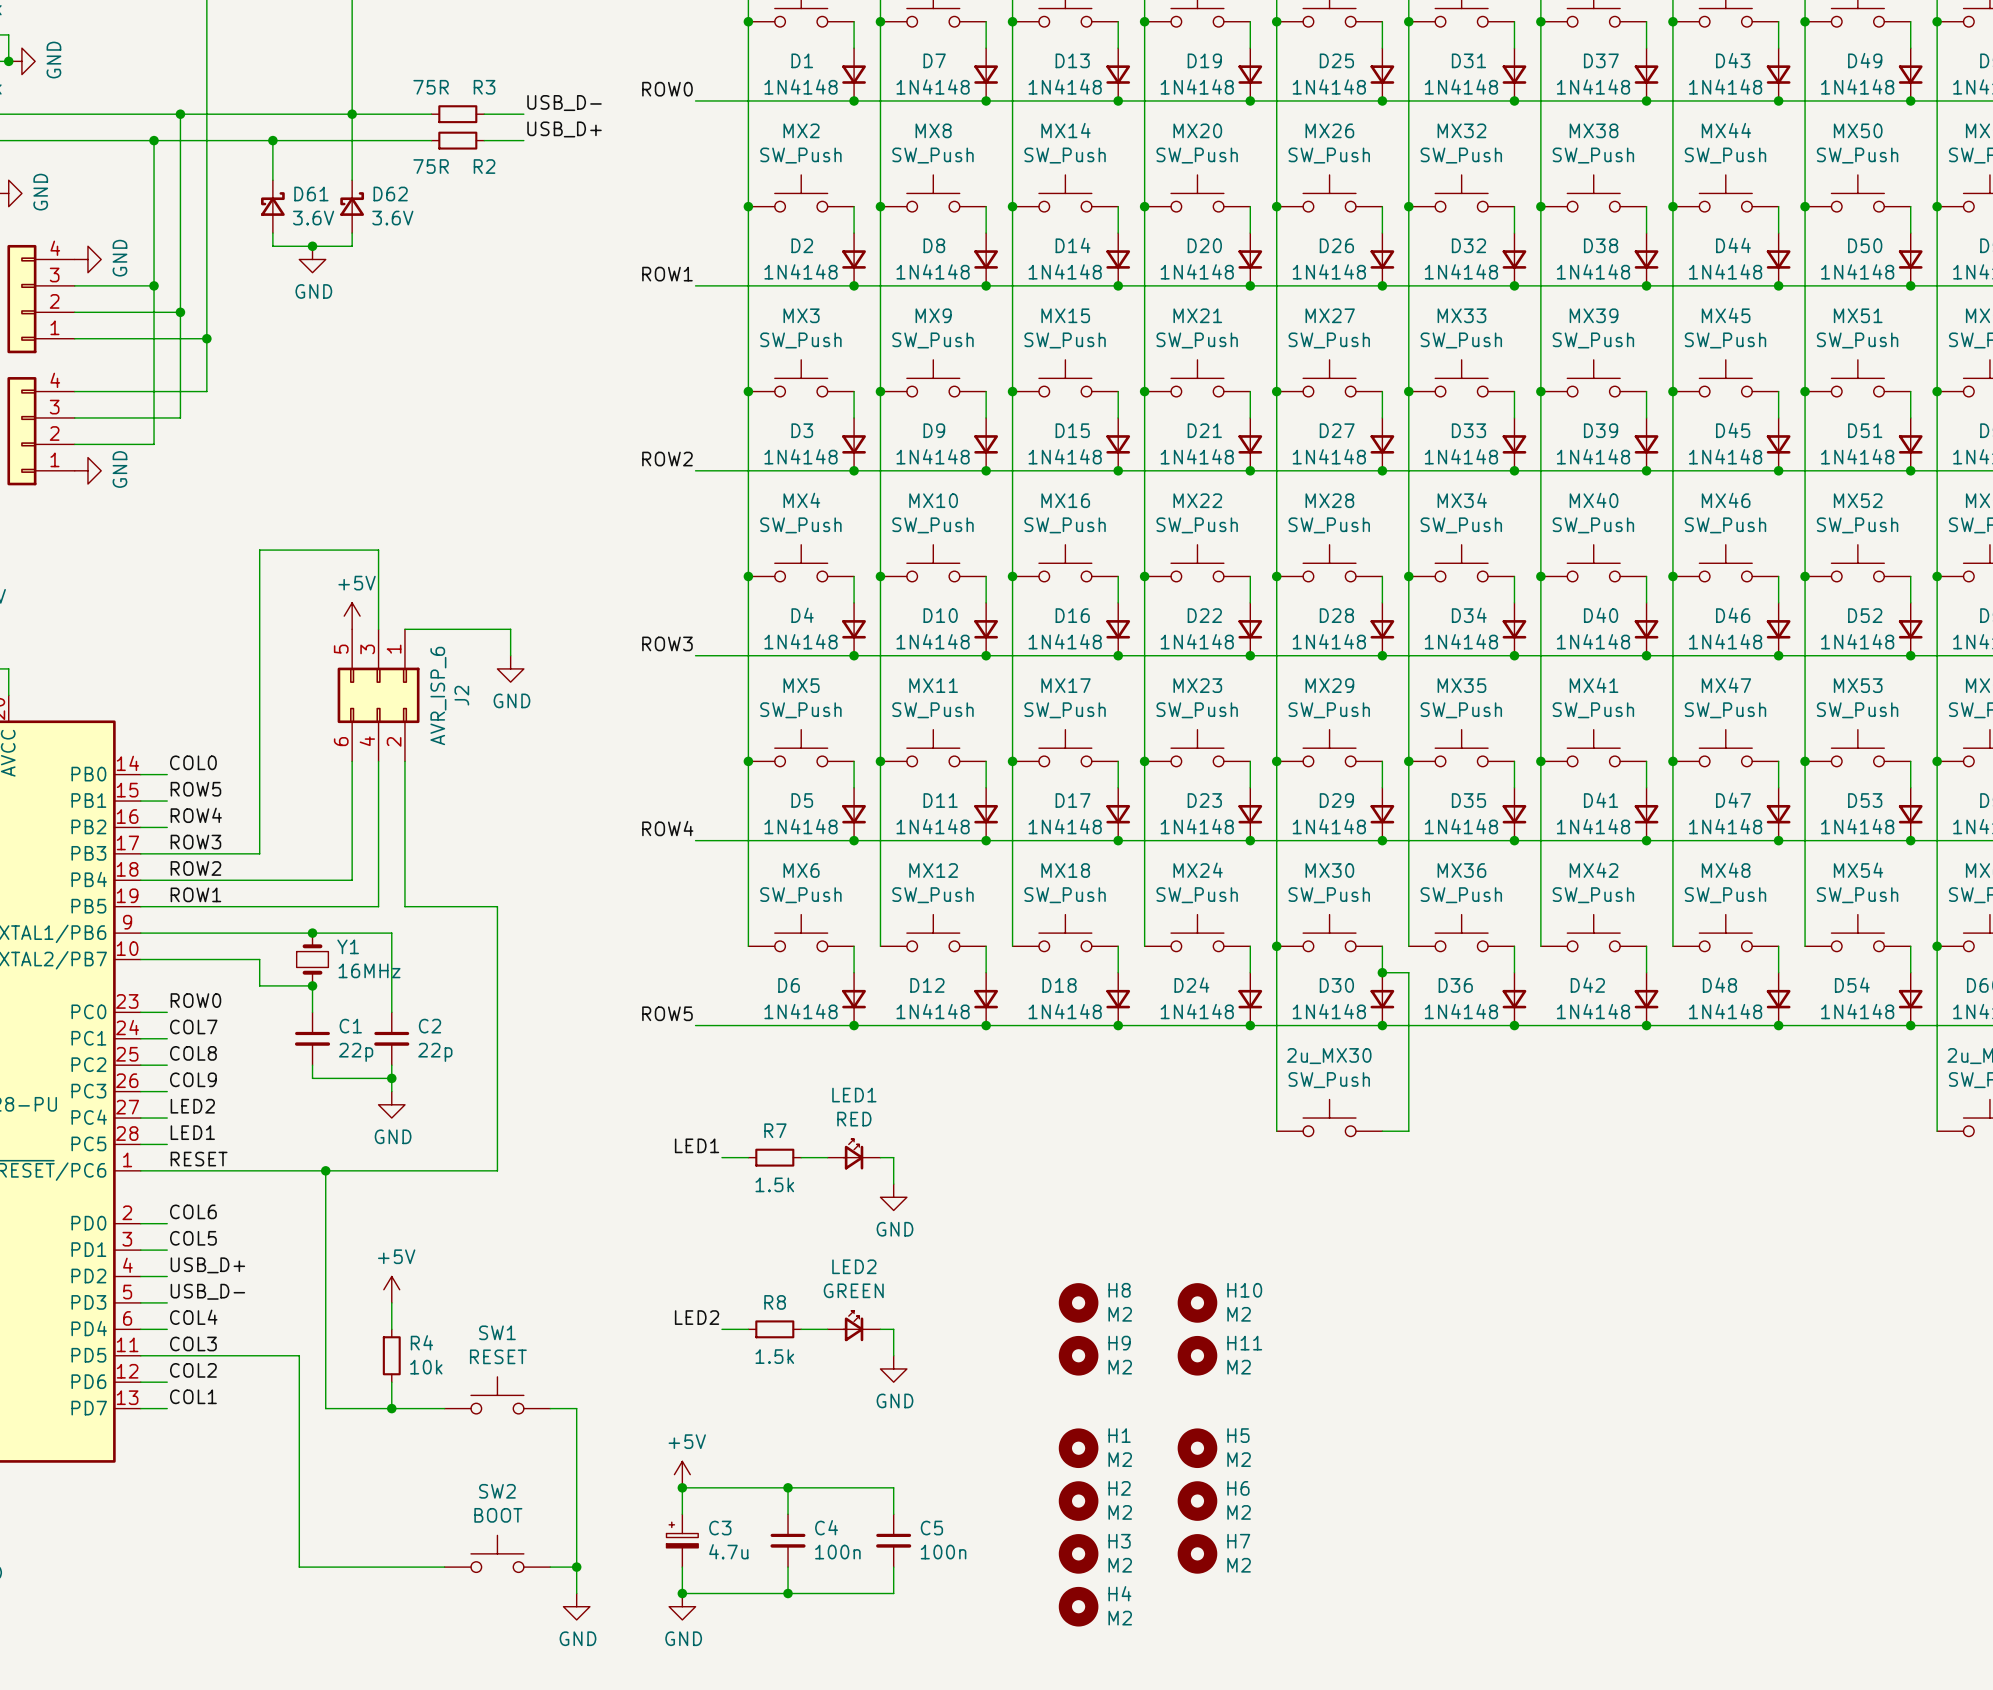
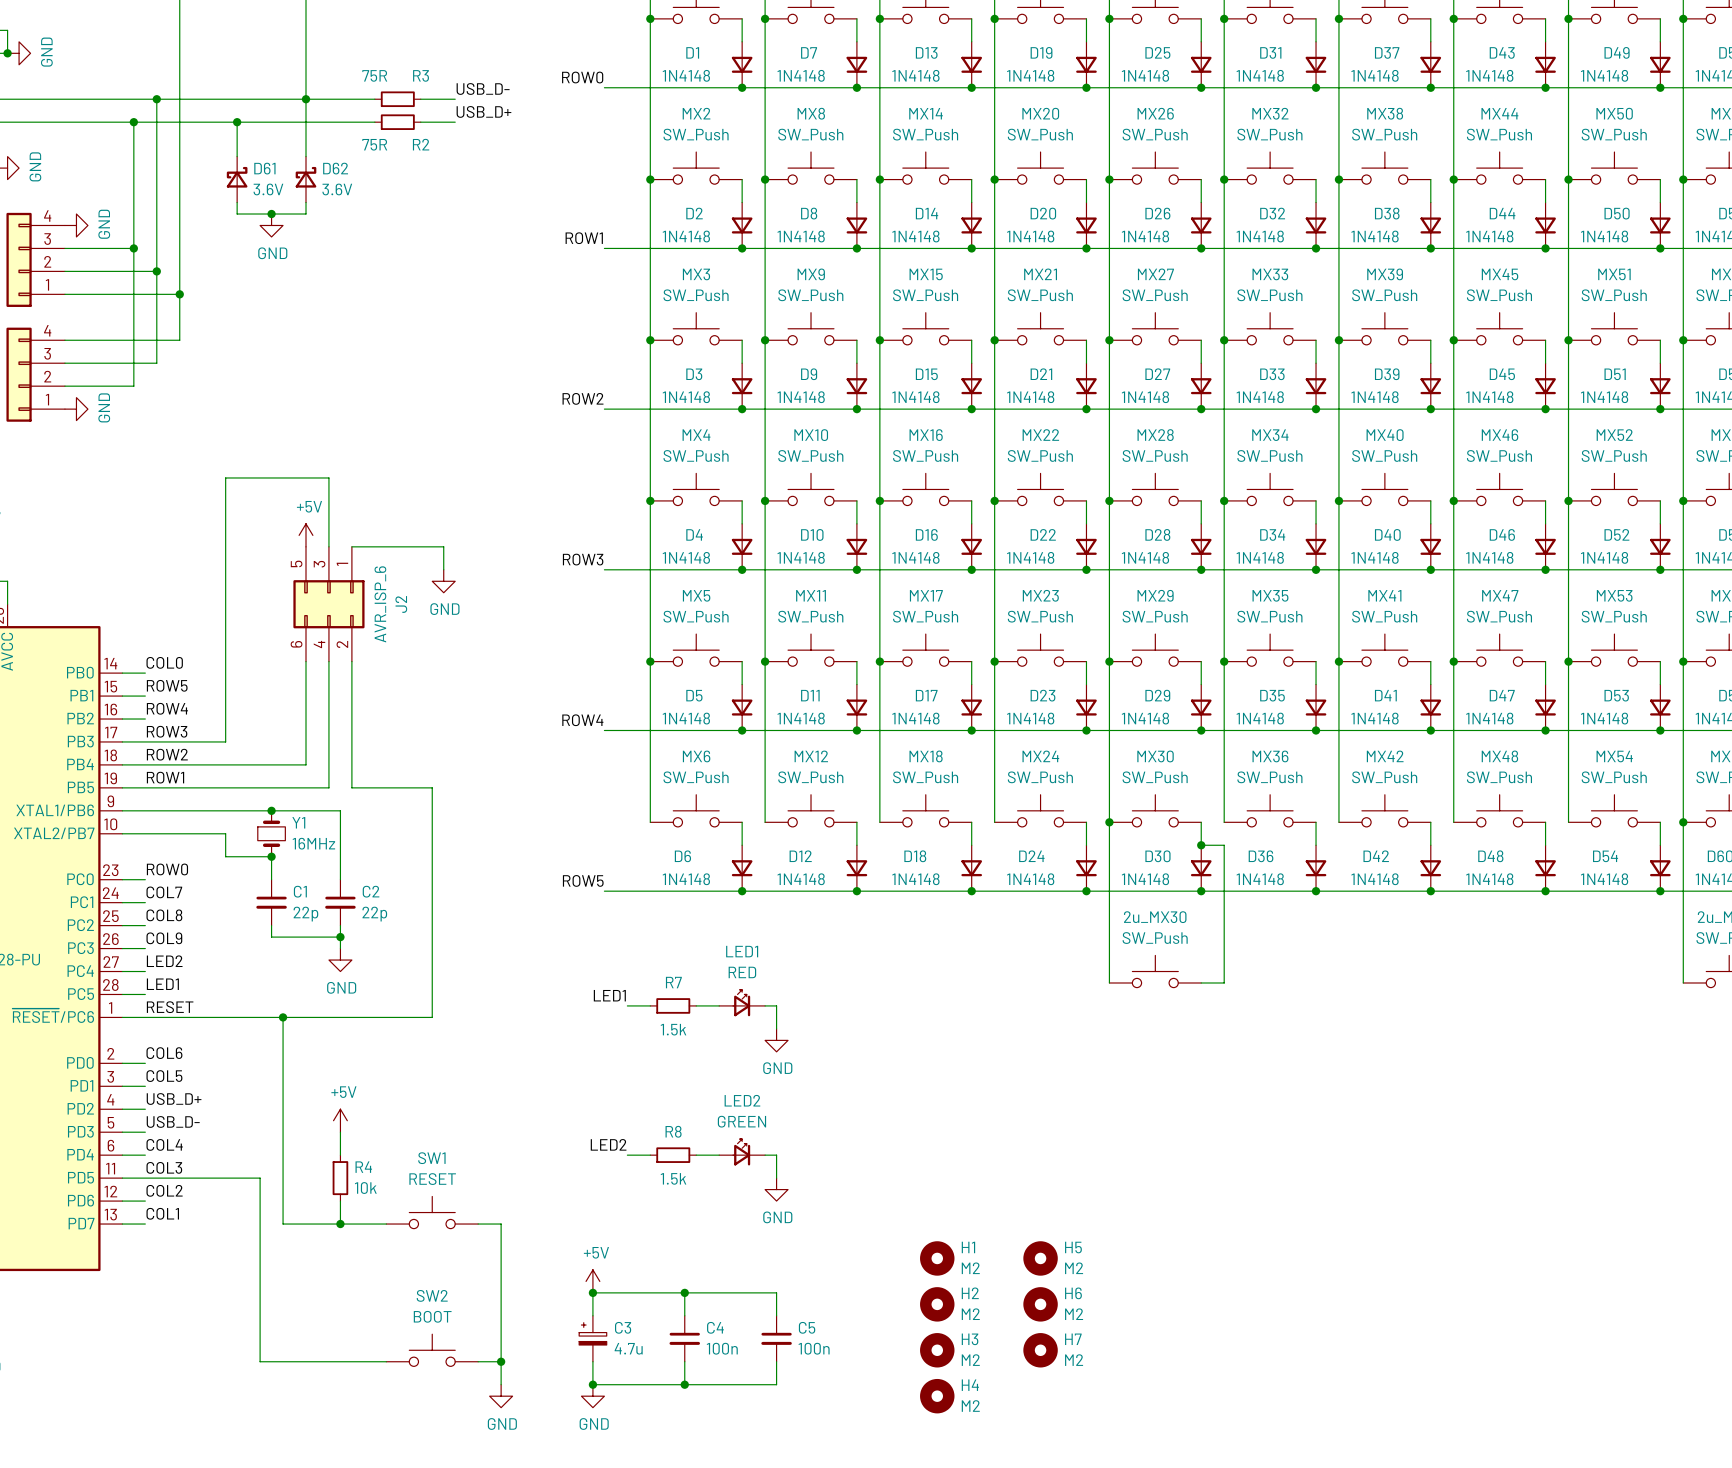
H8: M2 (1078, 1302) -> none
H10: M2 (1197, 1302) -> none
H9: M2 (1078, 1355) -> none
H11: M2 (1197, 1355) -> none

